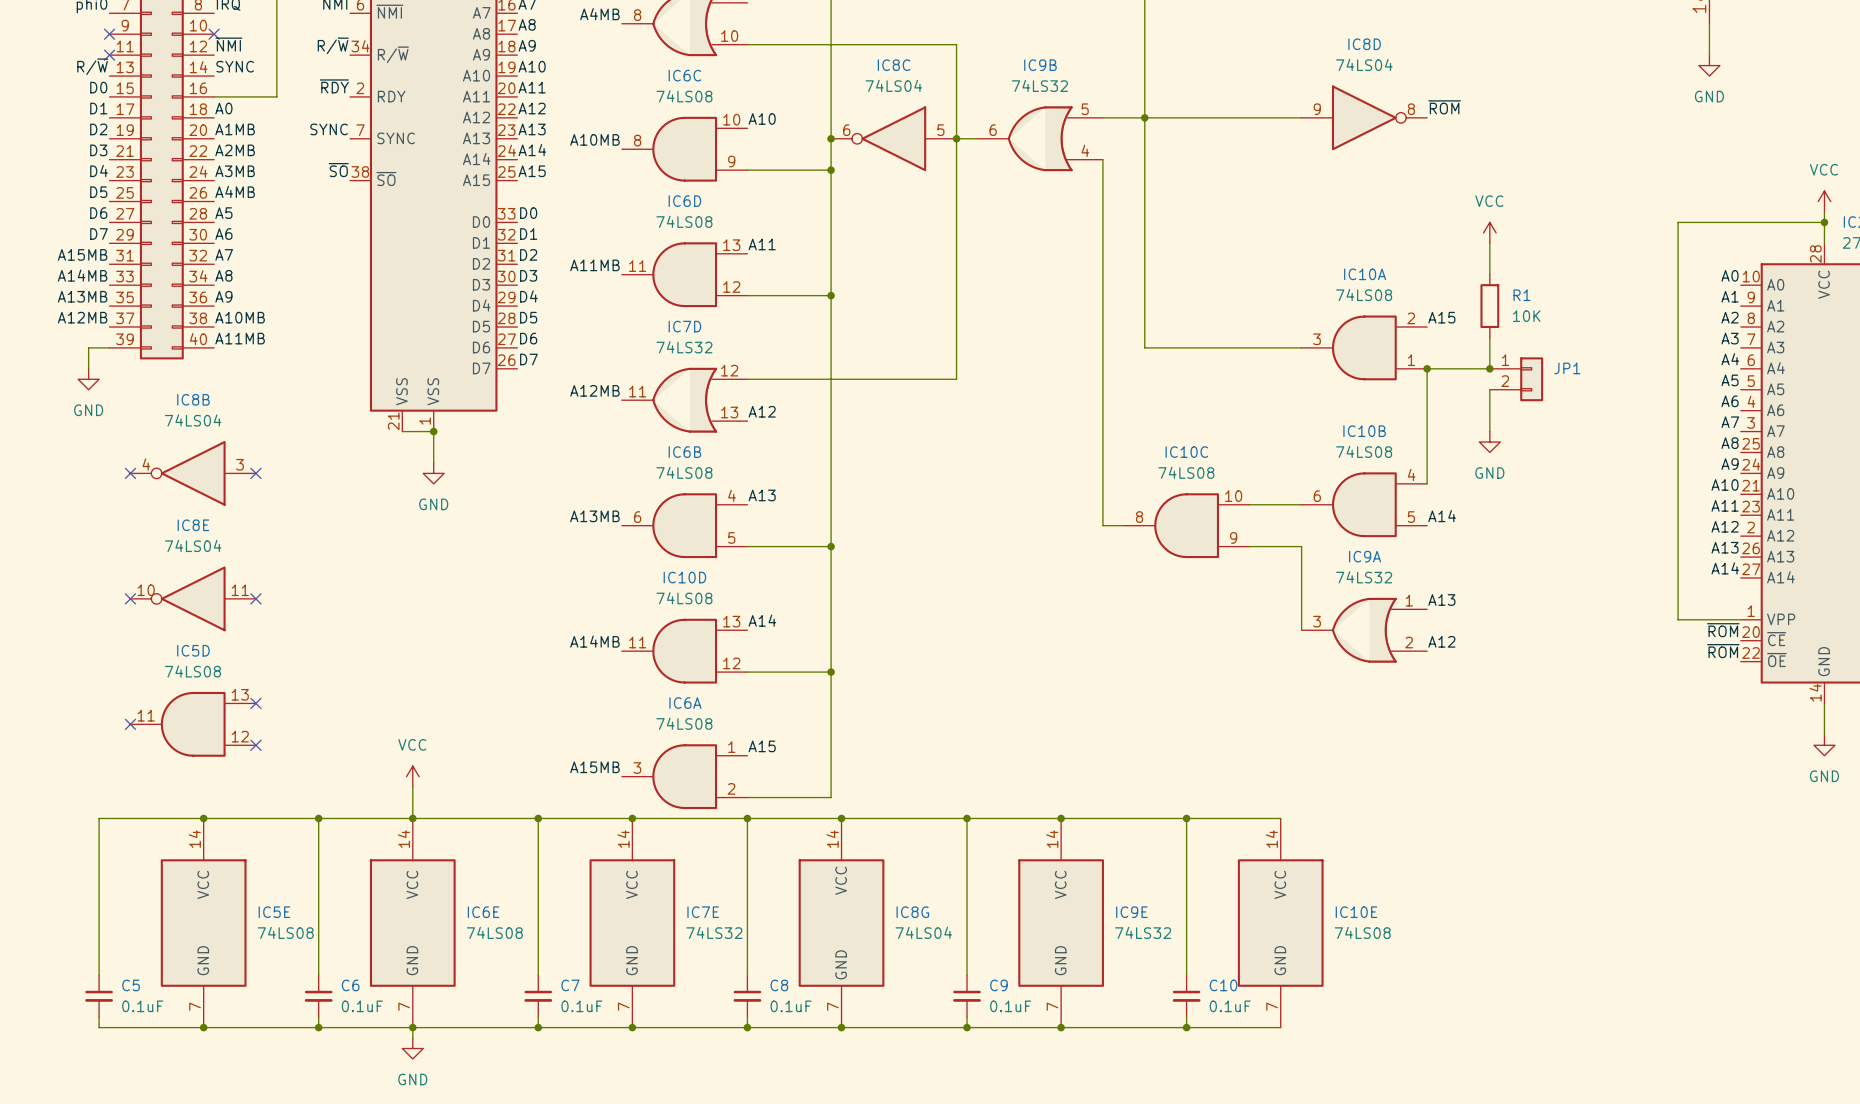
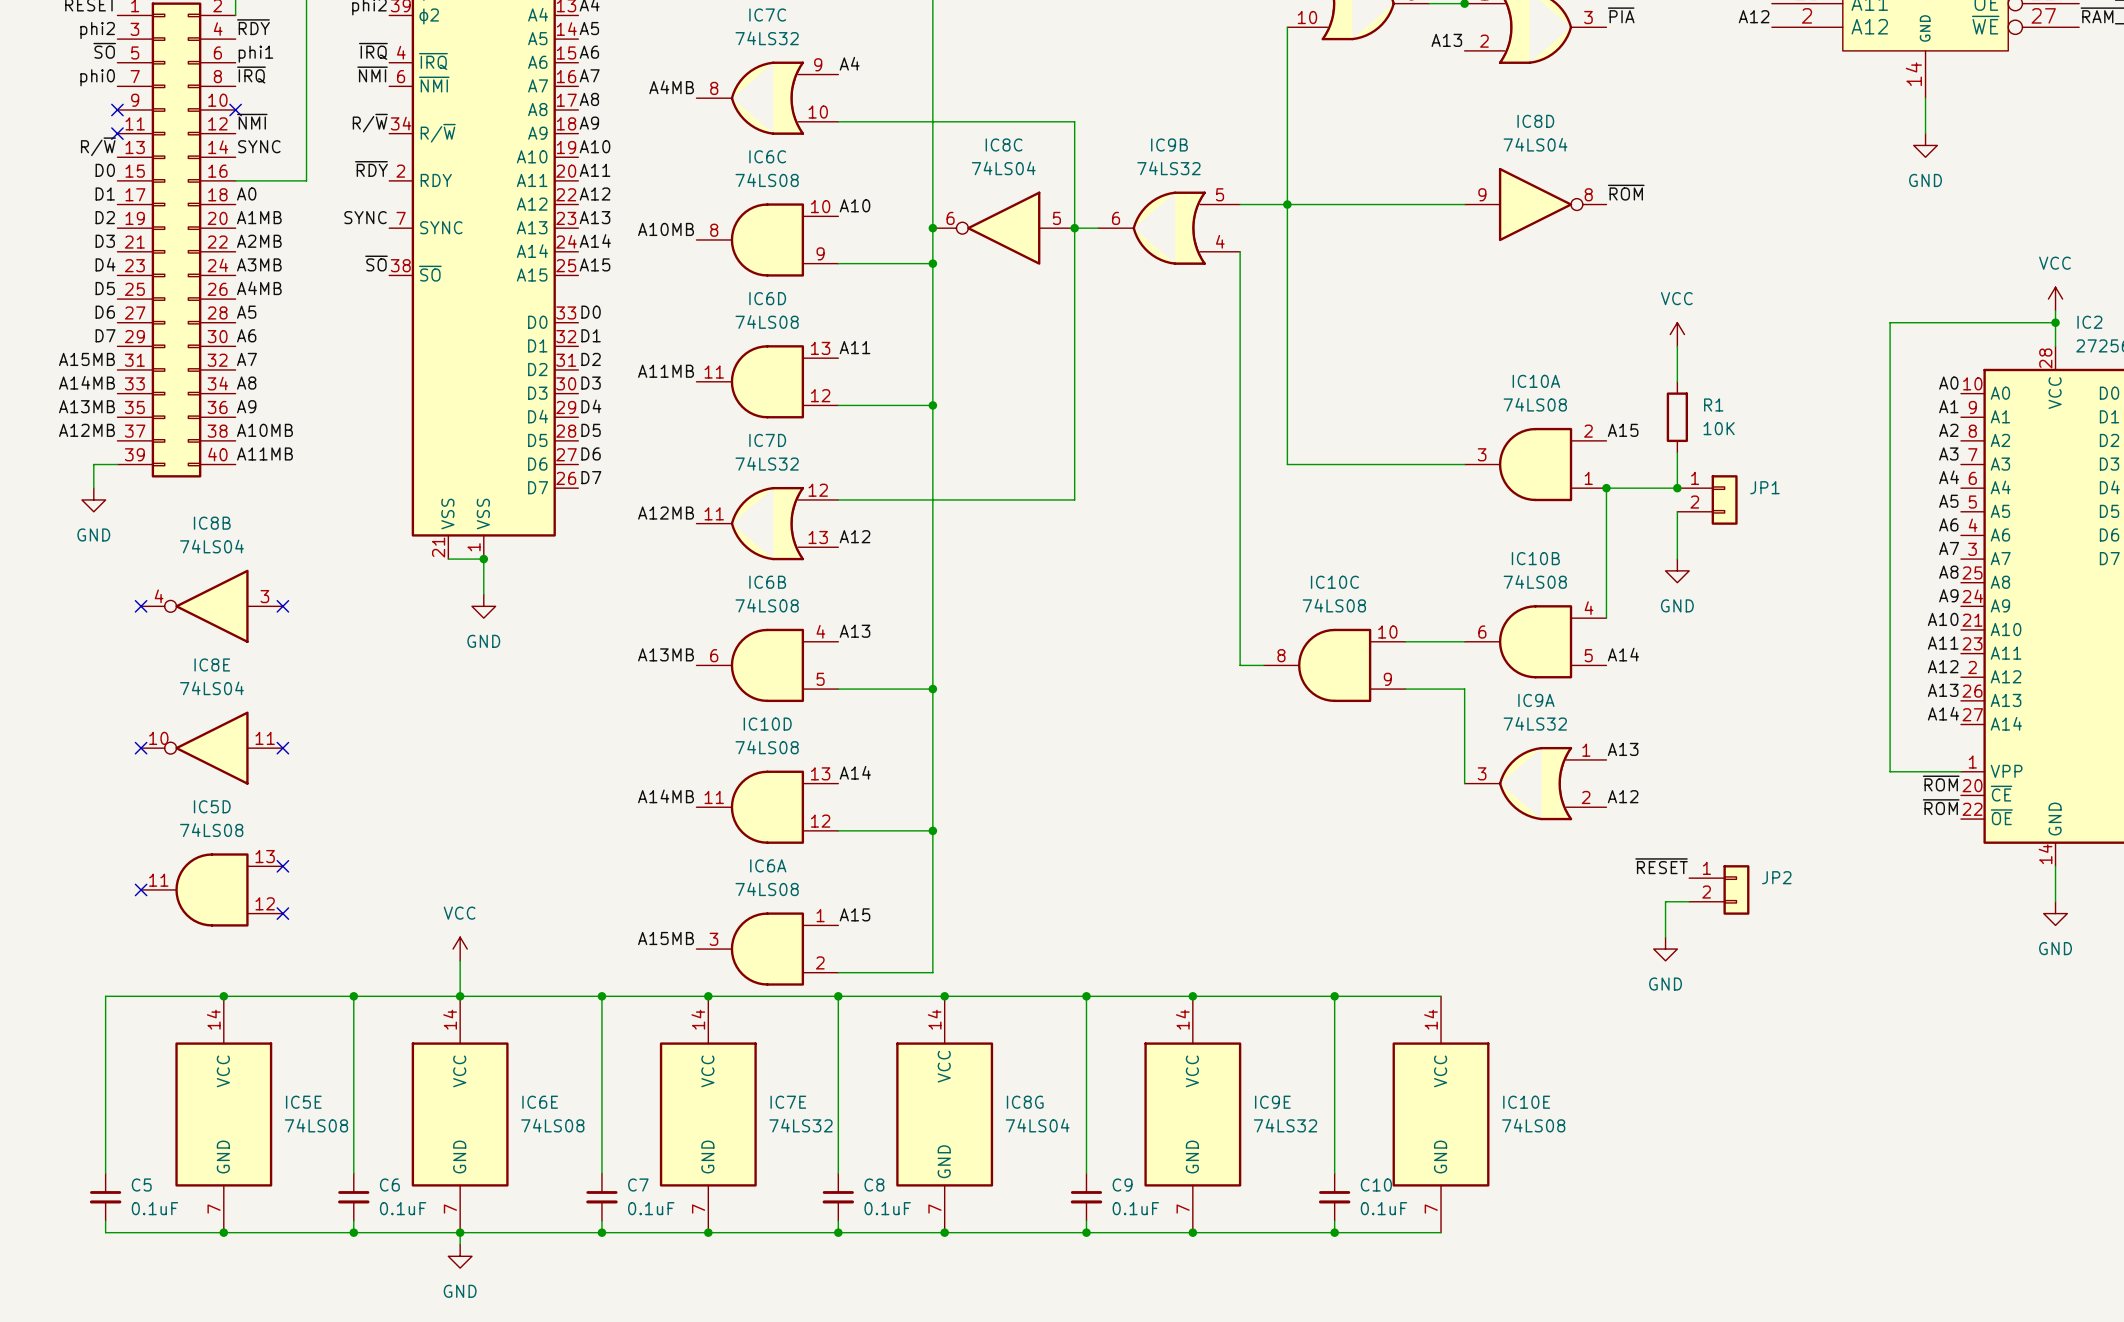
label: none -> ~{RESET} (1661, 866)
JP2: none -> (1719, 889)
wire: none -> (1689, 901) (1665, 901) (1665, 937)
power symbol: none -> GND (1665, 949)

